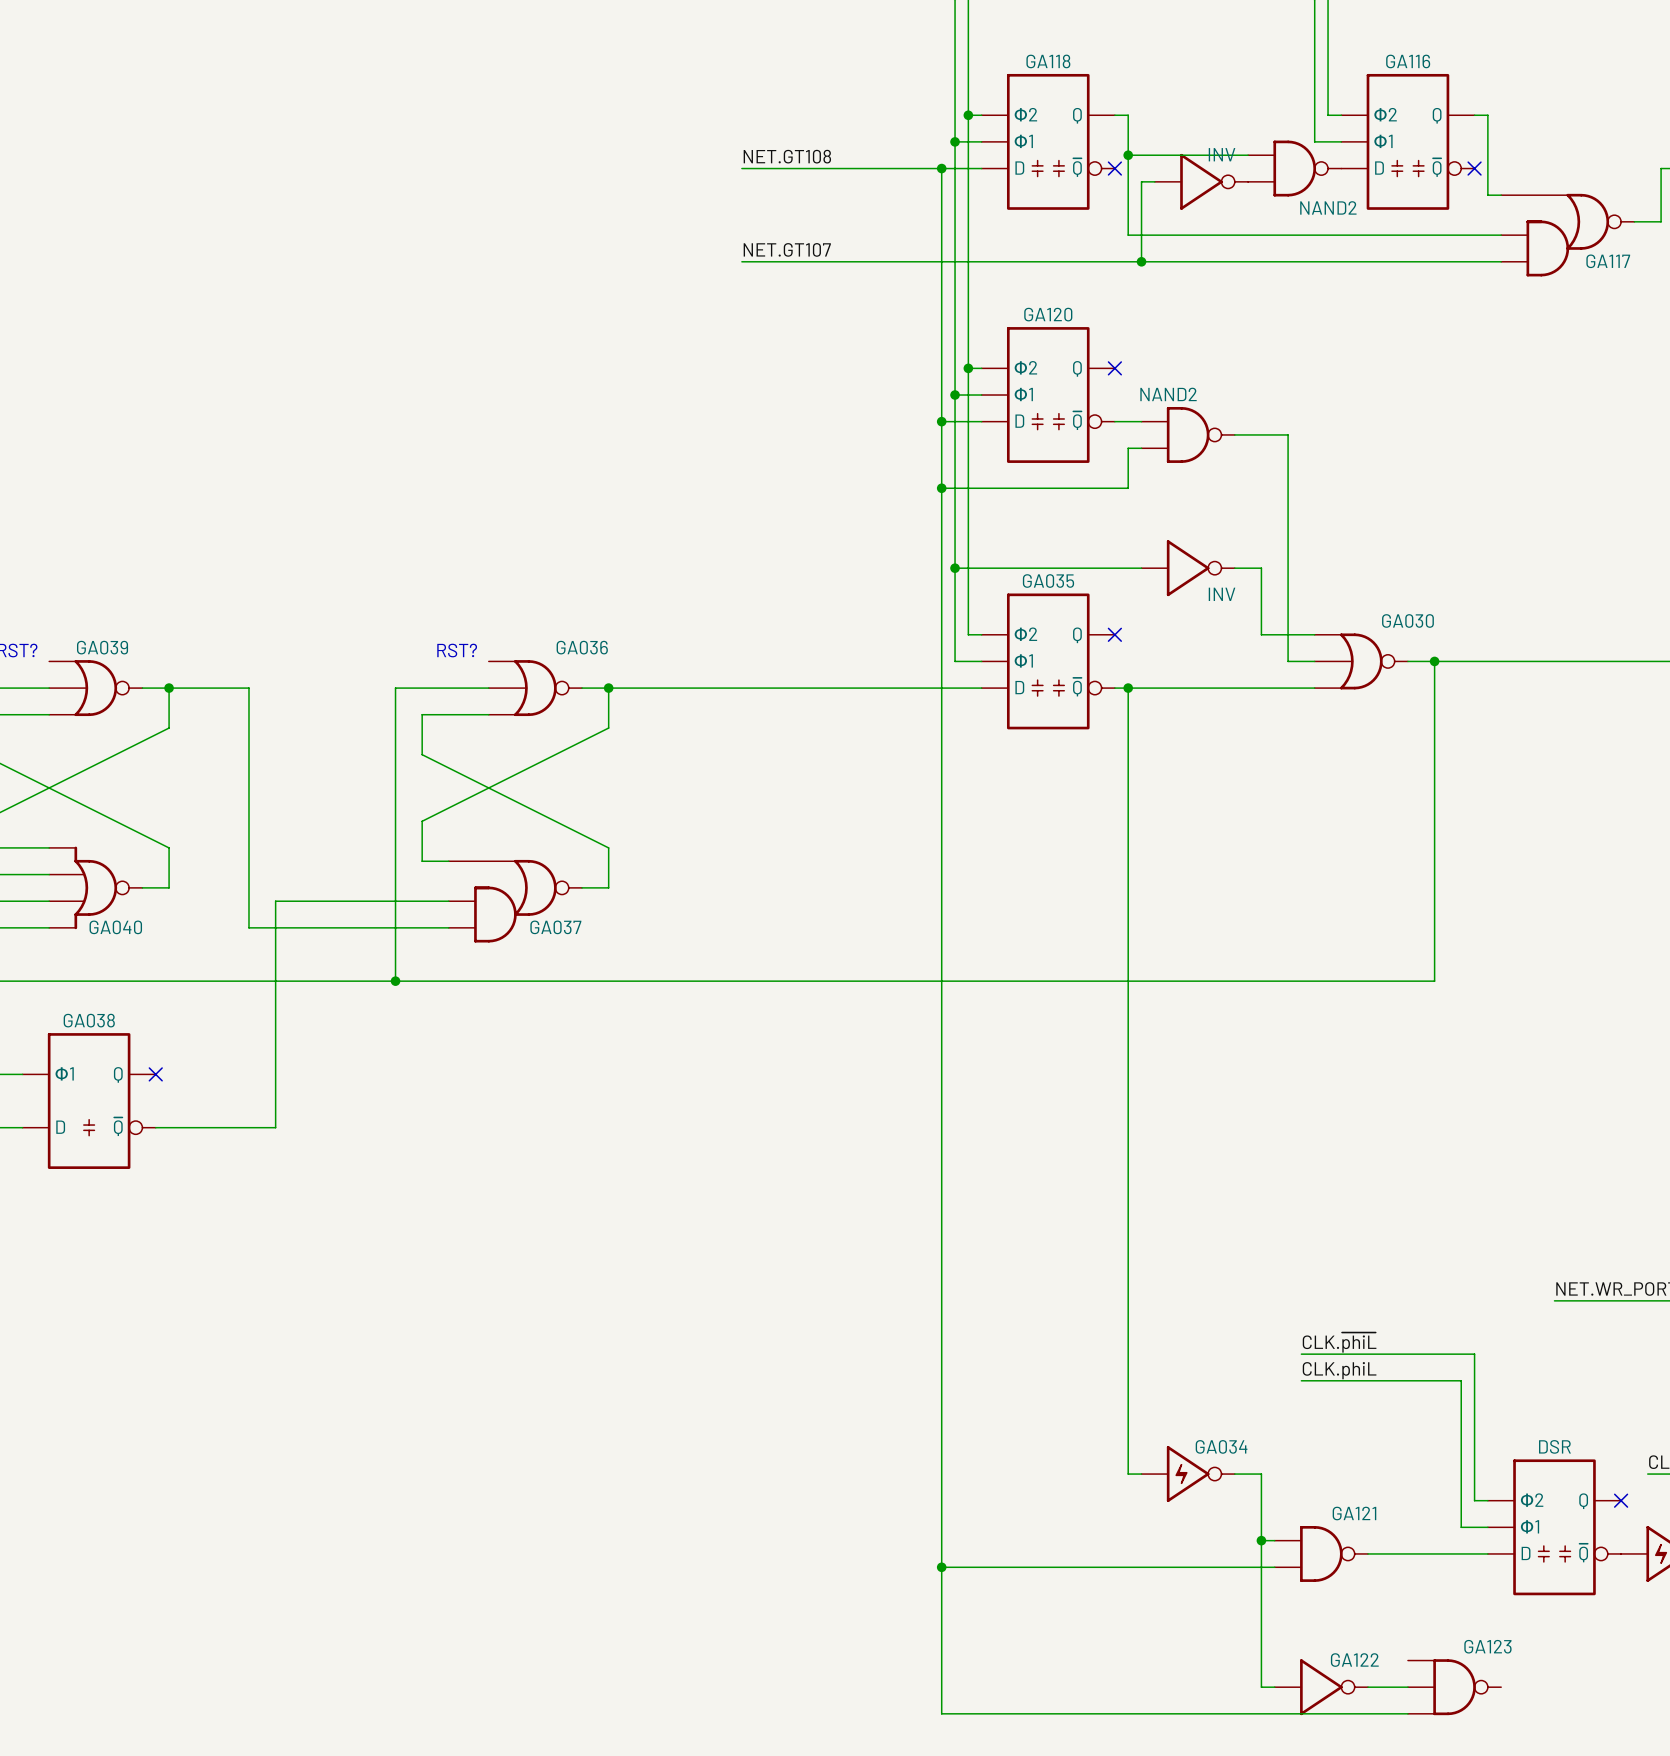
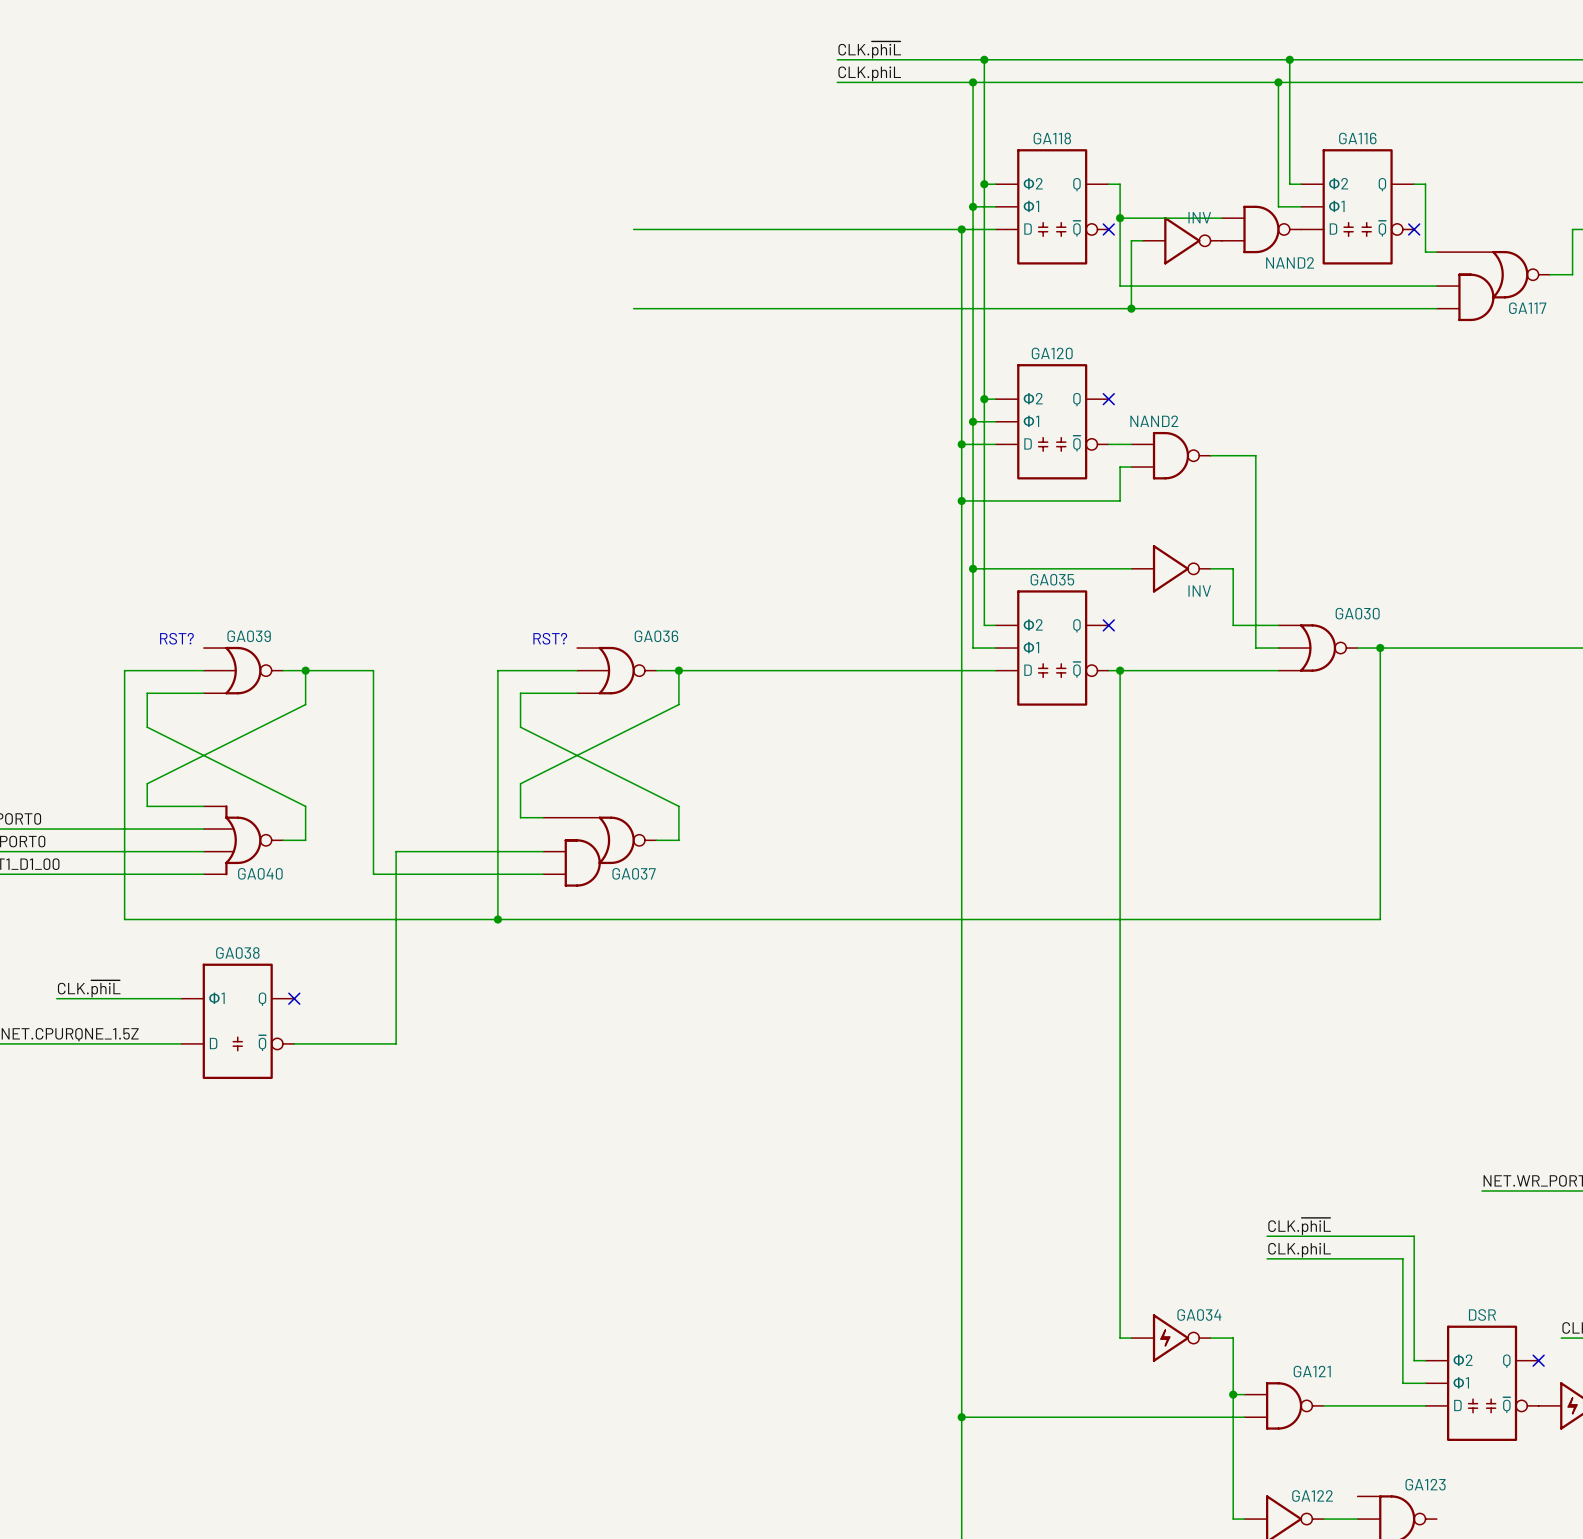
label: NET.GT108 (787, 156) -> none
wire: none -> (633, 229) (792, 229)
label: NET.GT107 (787, 249) -> none
wire: none -> (633, 308) (792, 308)

